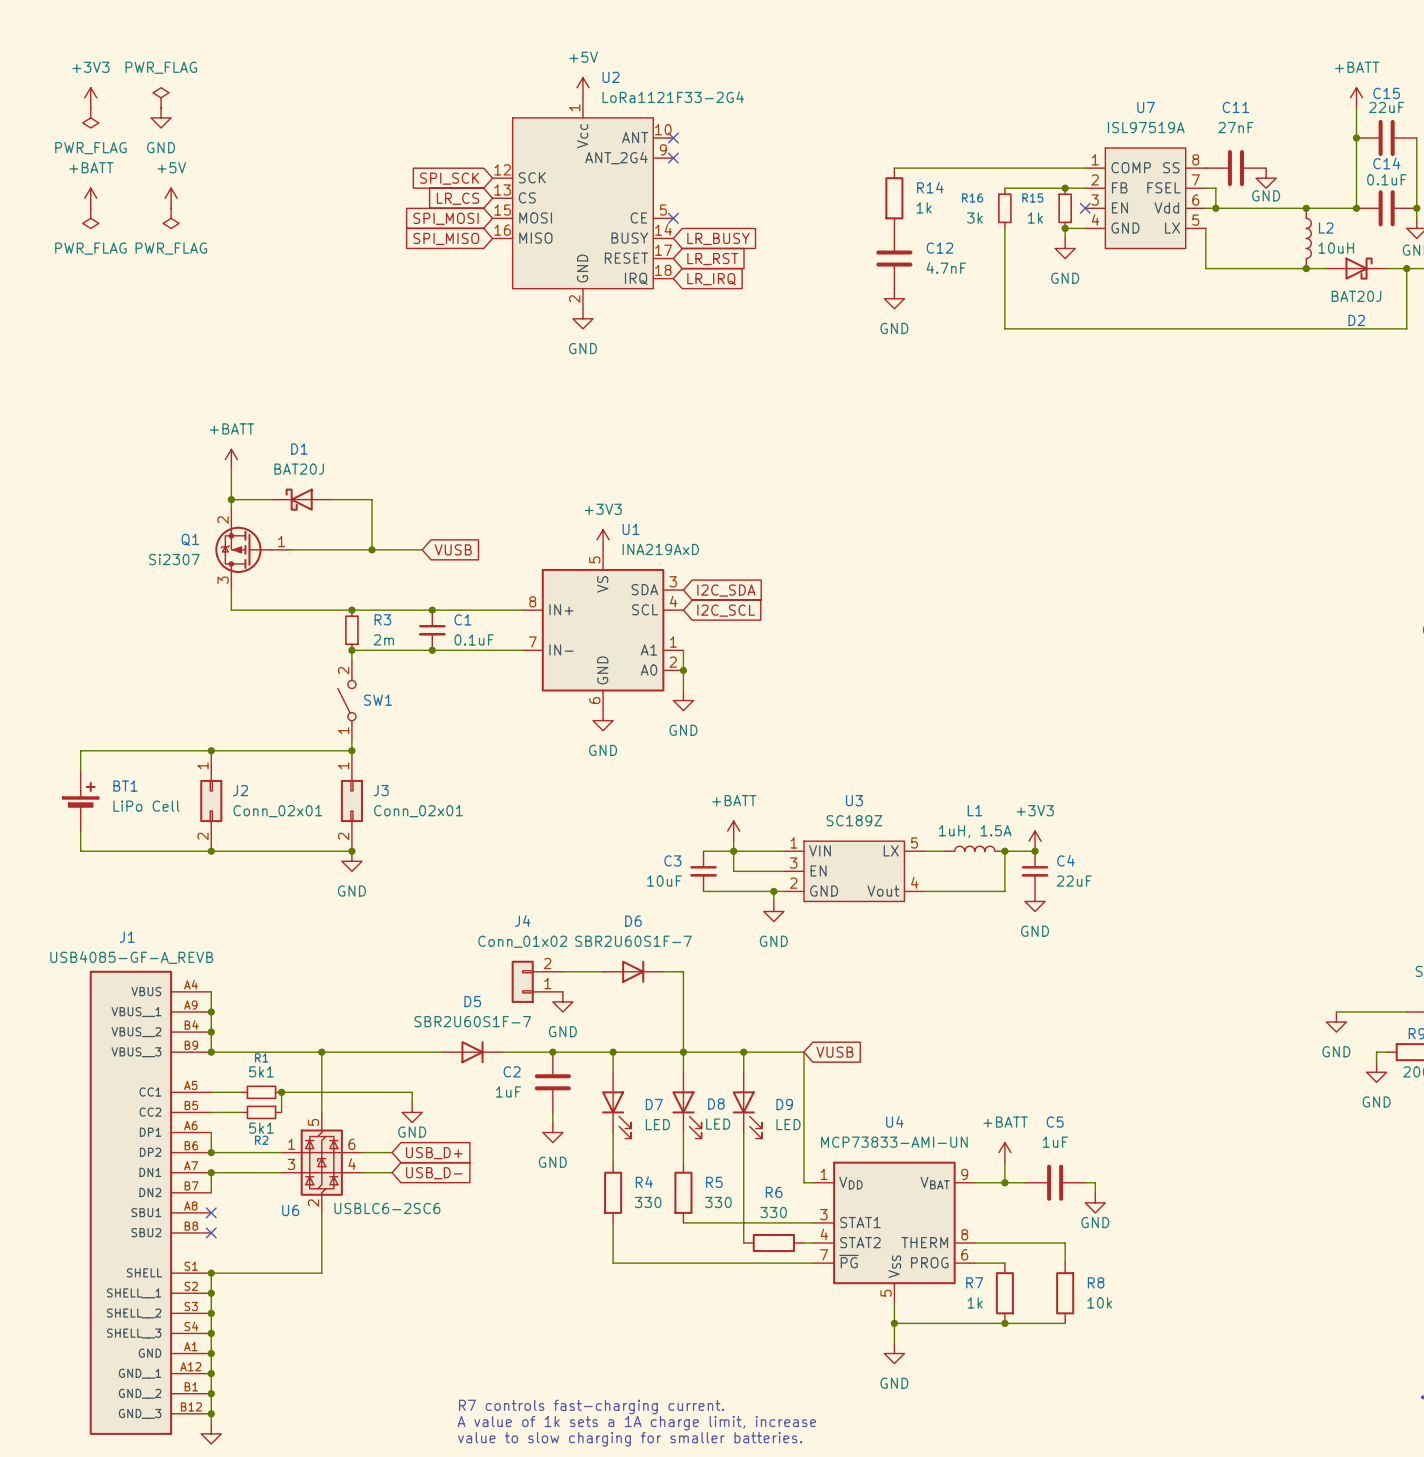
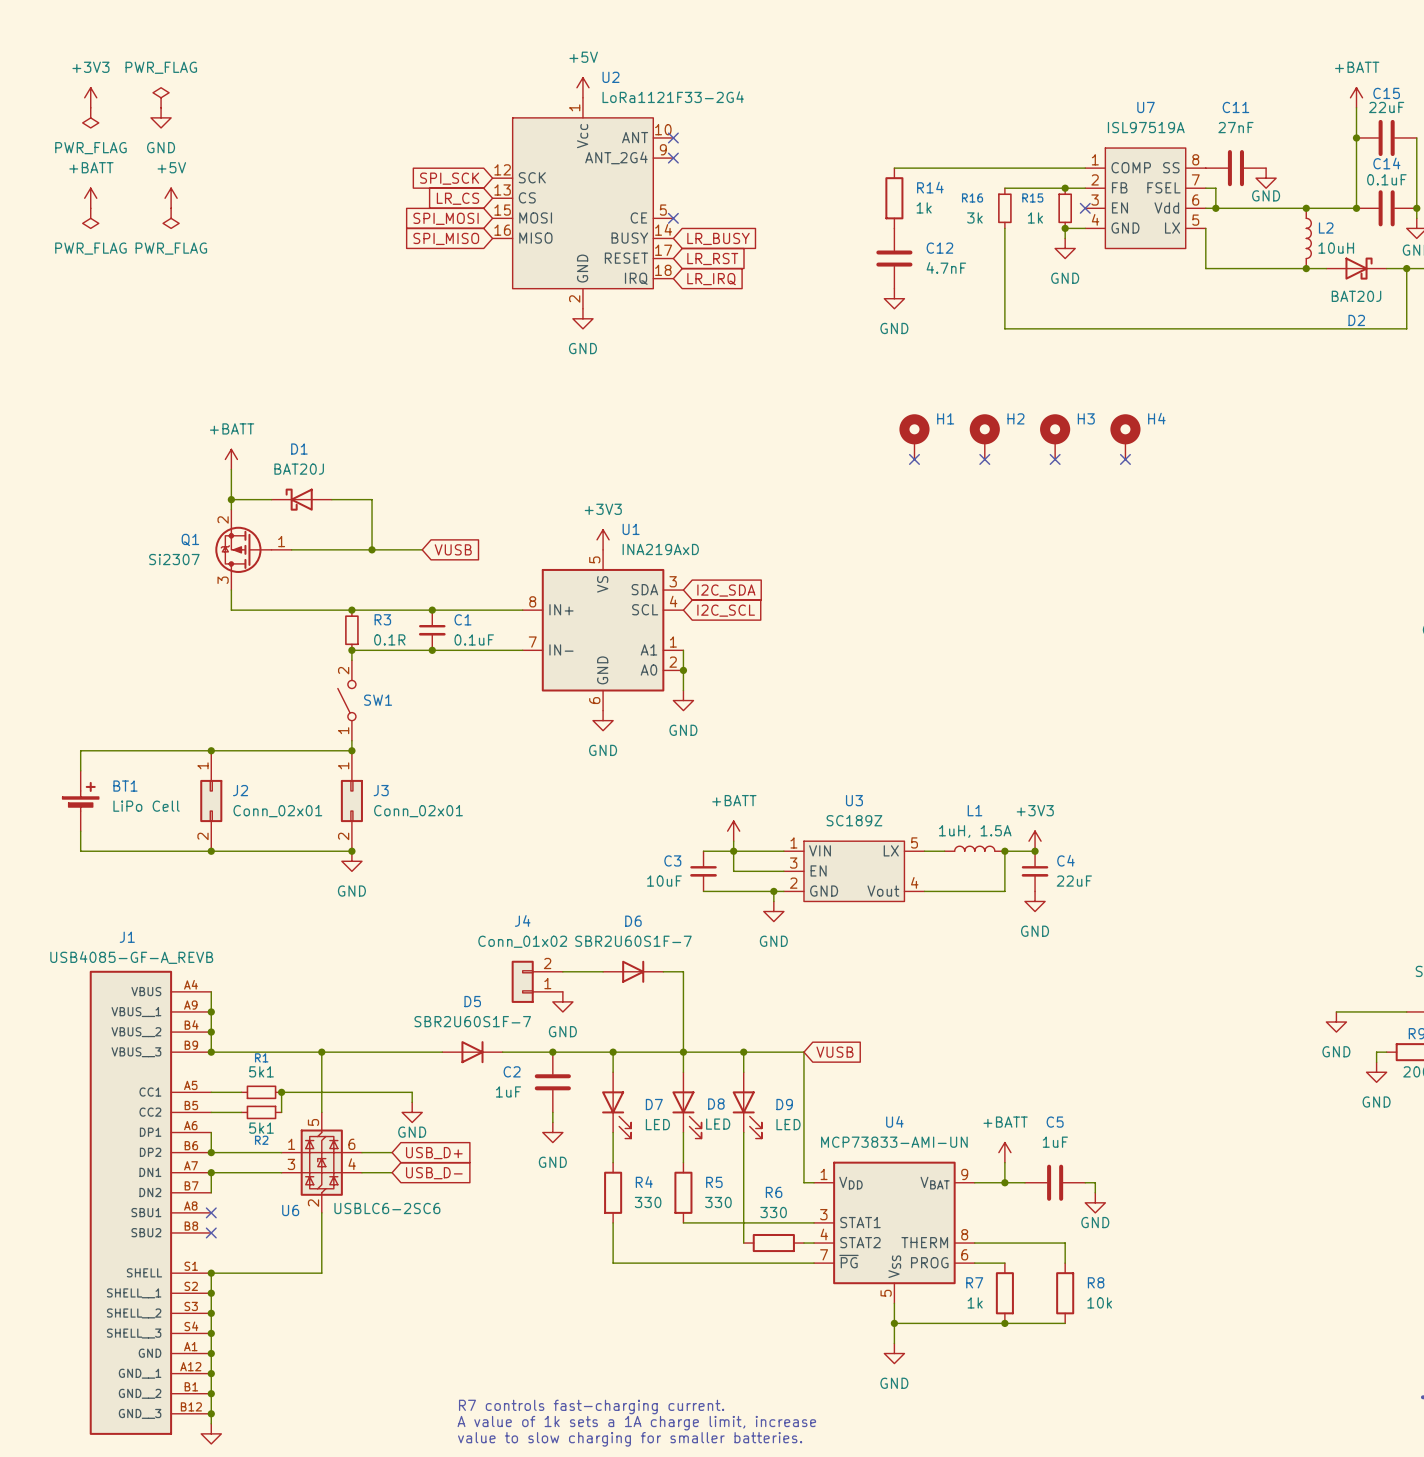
H1: none -> (914, 436)
H2: none -> (984, 436)
H3: none -> (1055, 436)
H4: none -> (1125, 436)
no-connect mark: none -> (914, 459)
no-connect mark: none -> (984, 459)
no-connect mark: none -> (1055, 459)
no-connect mark: none -> (1125, 459)
R3 value: 2m (383, 639) -> 0.1R (389, 639)

